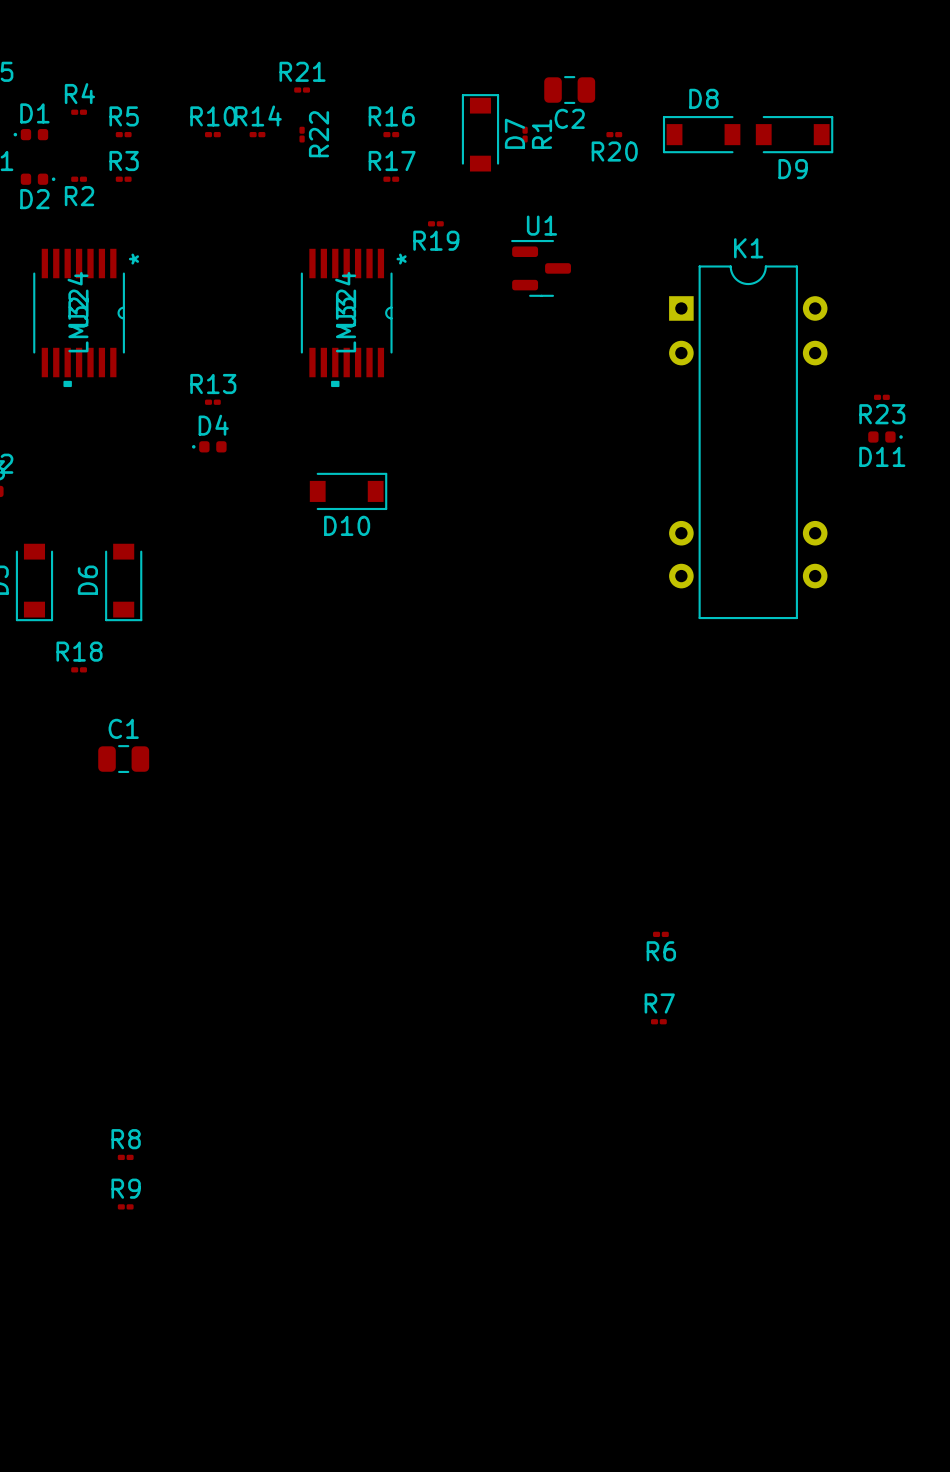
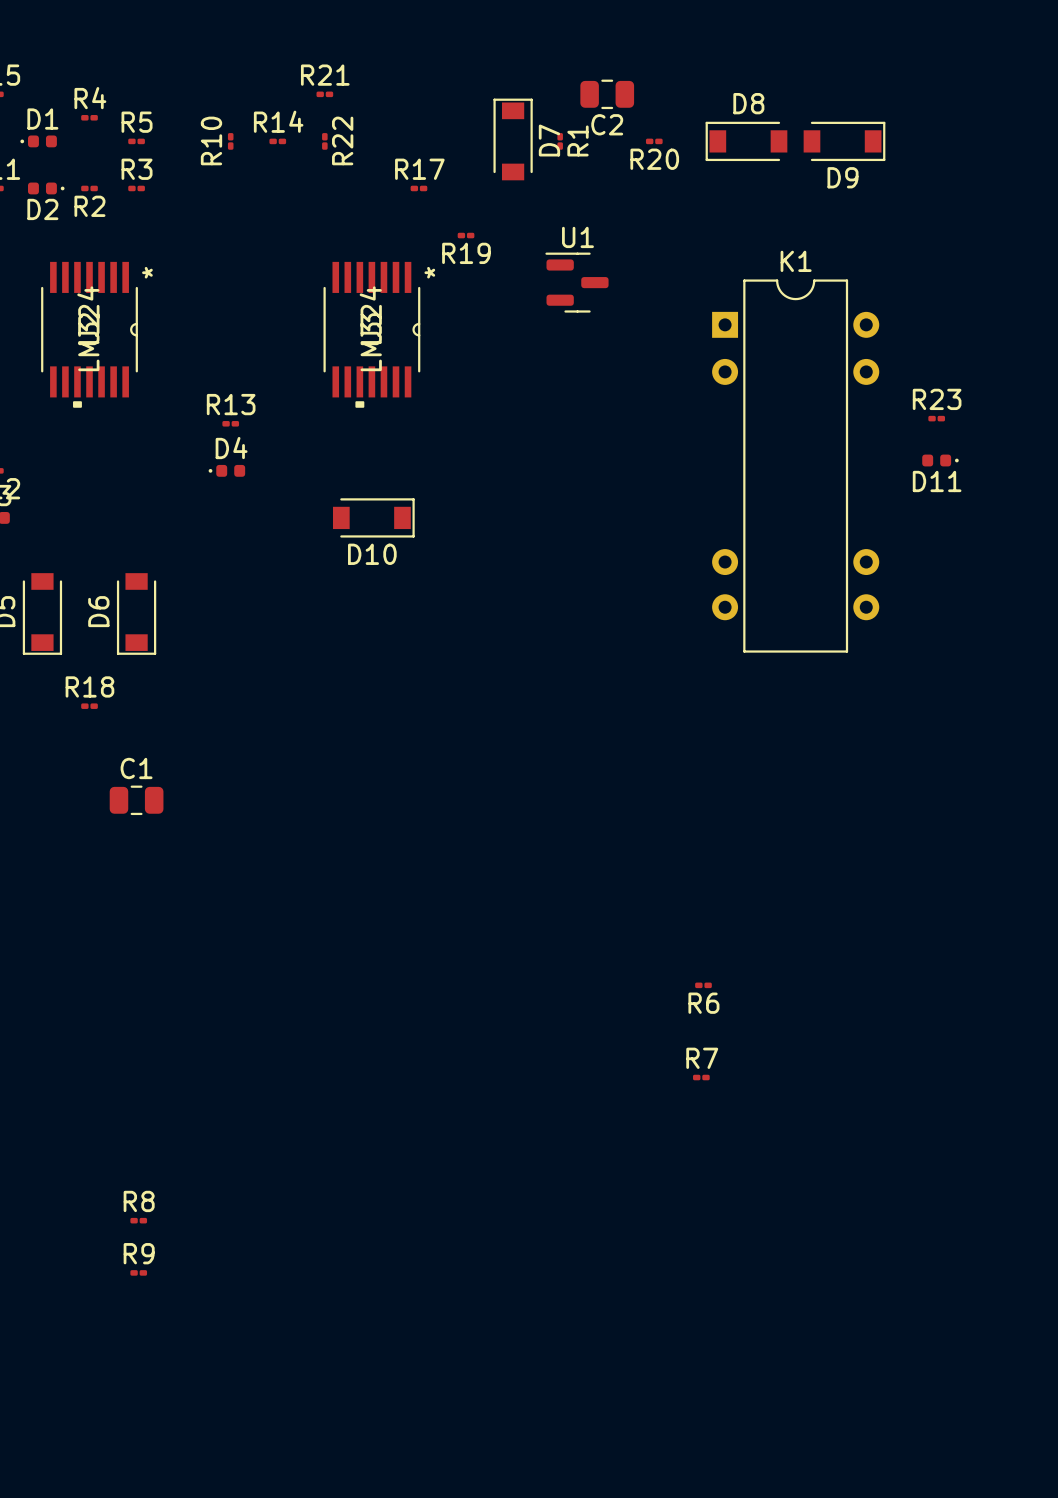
R10 rotation: 0° (212, 134) -> 90° clockwise (230, 141)
R16: (391, 134) -> none
R23 name position: R23 (882, 414) -> R23 (937, 399)

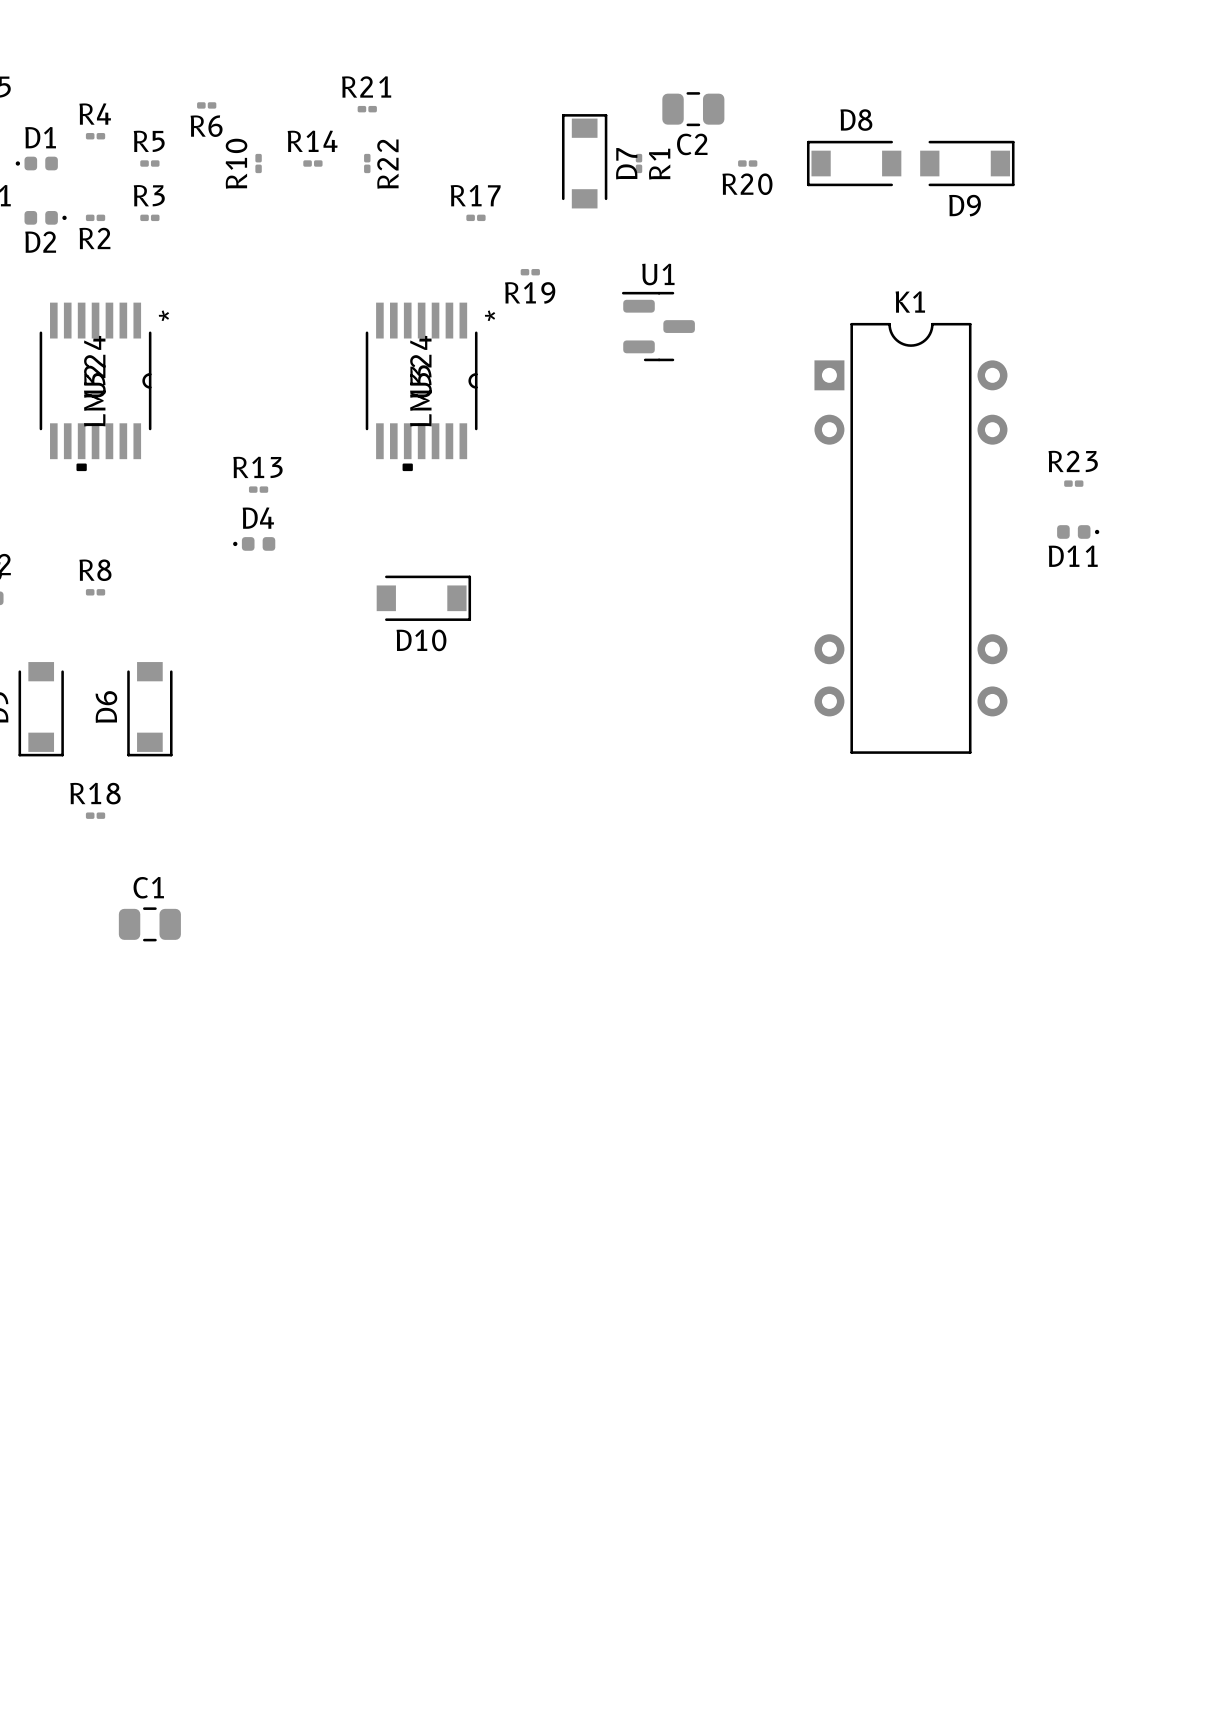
R6 position: (703, 985) -> (206, 105)
R7: (701, 1077) -> none
R8 position: (138, 1220) -> (95, 592)
R9: (138, 1272) -> none

